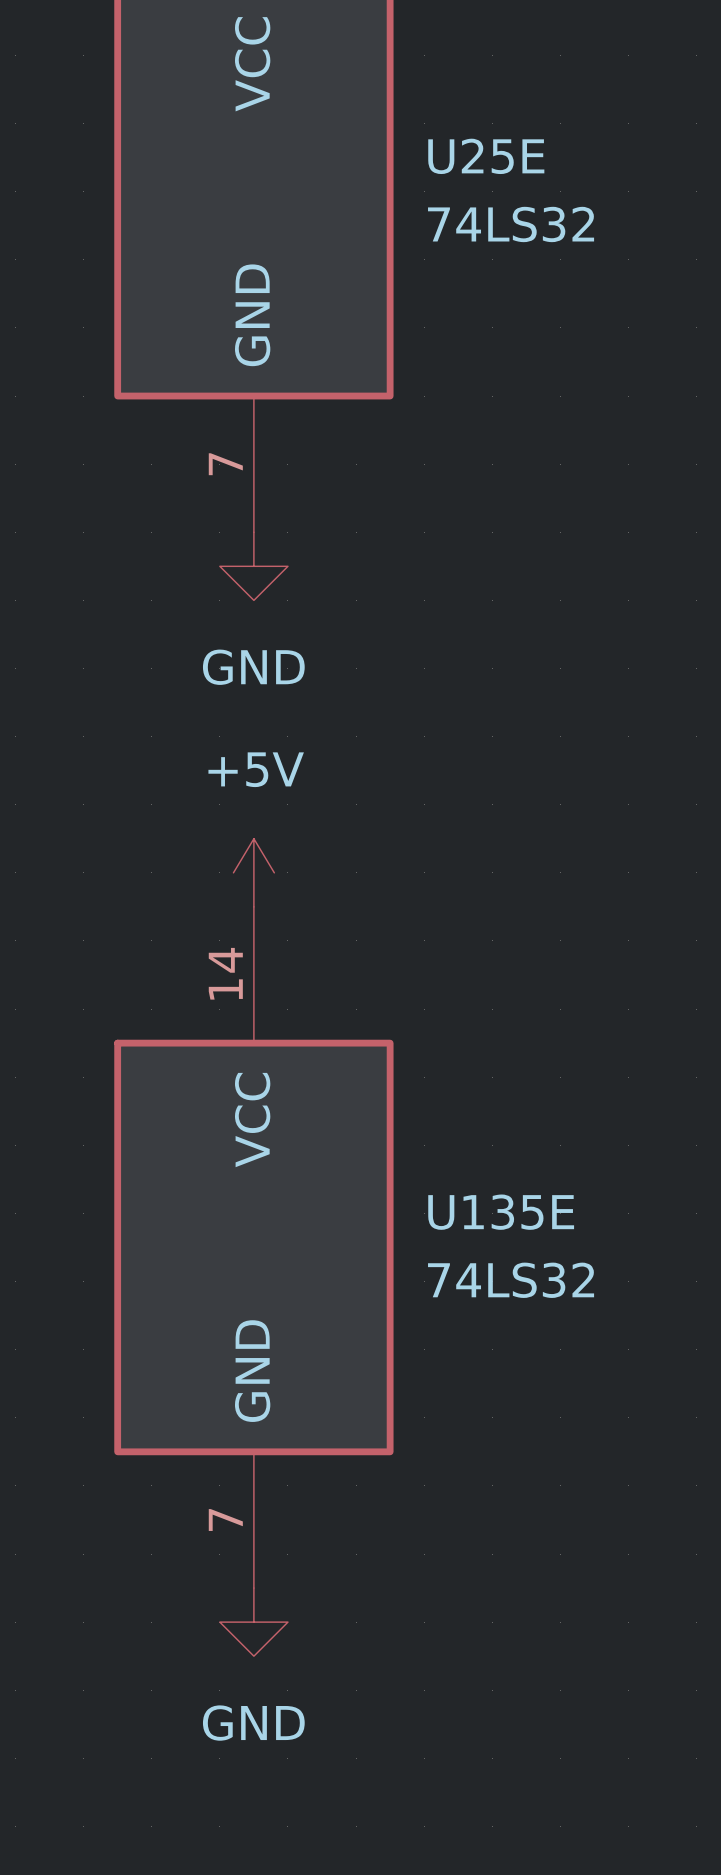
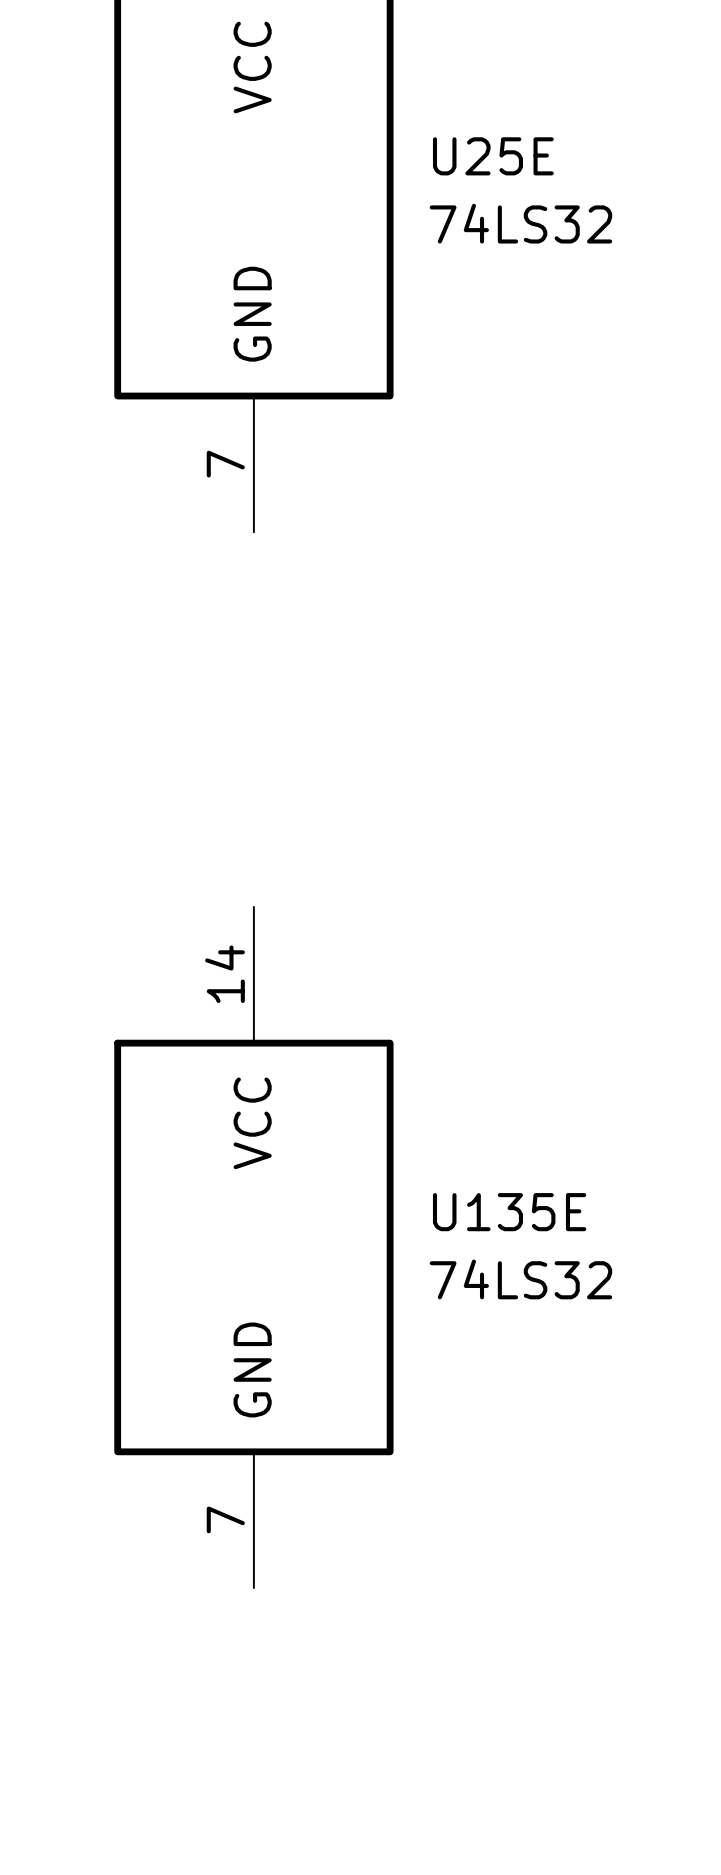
power symbol: GND (253, 566) -> none
power symbol: +5V (253, 872) -> none
power symbol: GND (253, 1622) -> none

